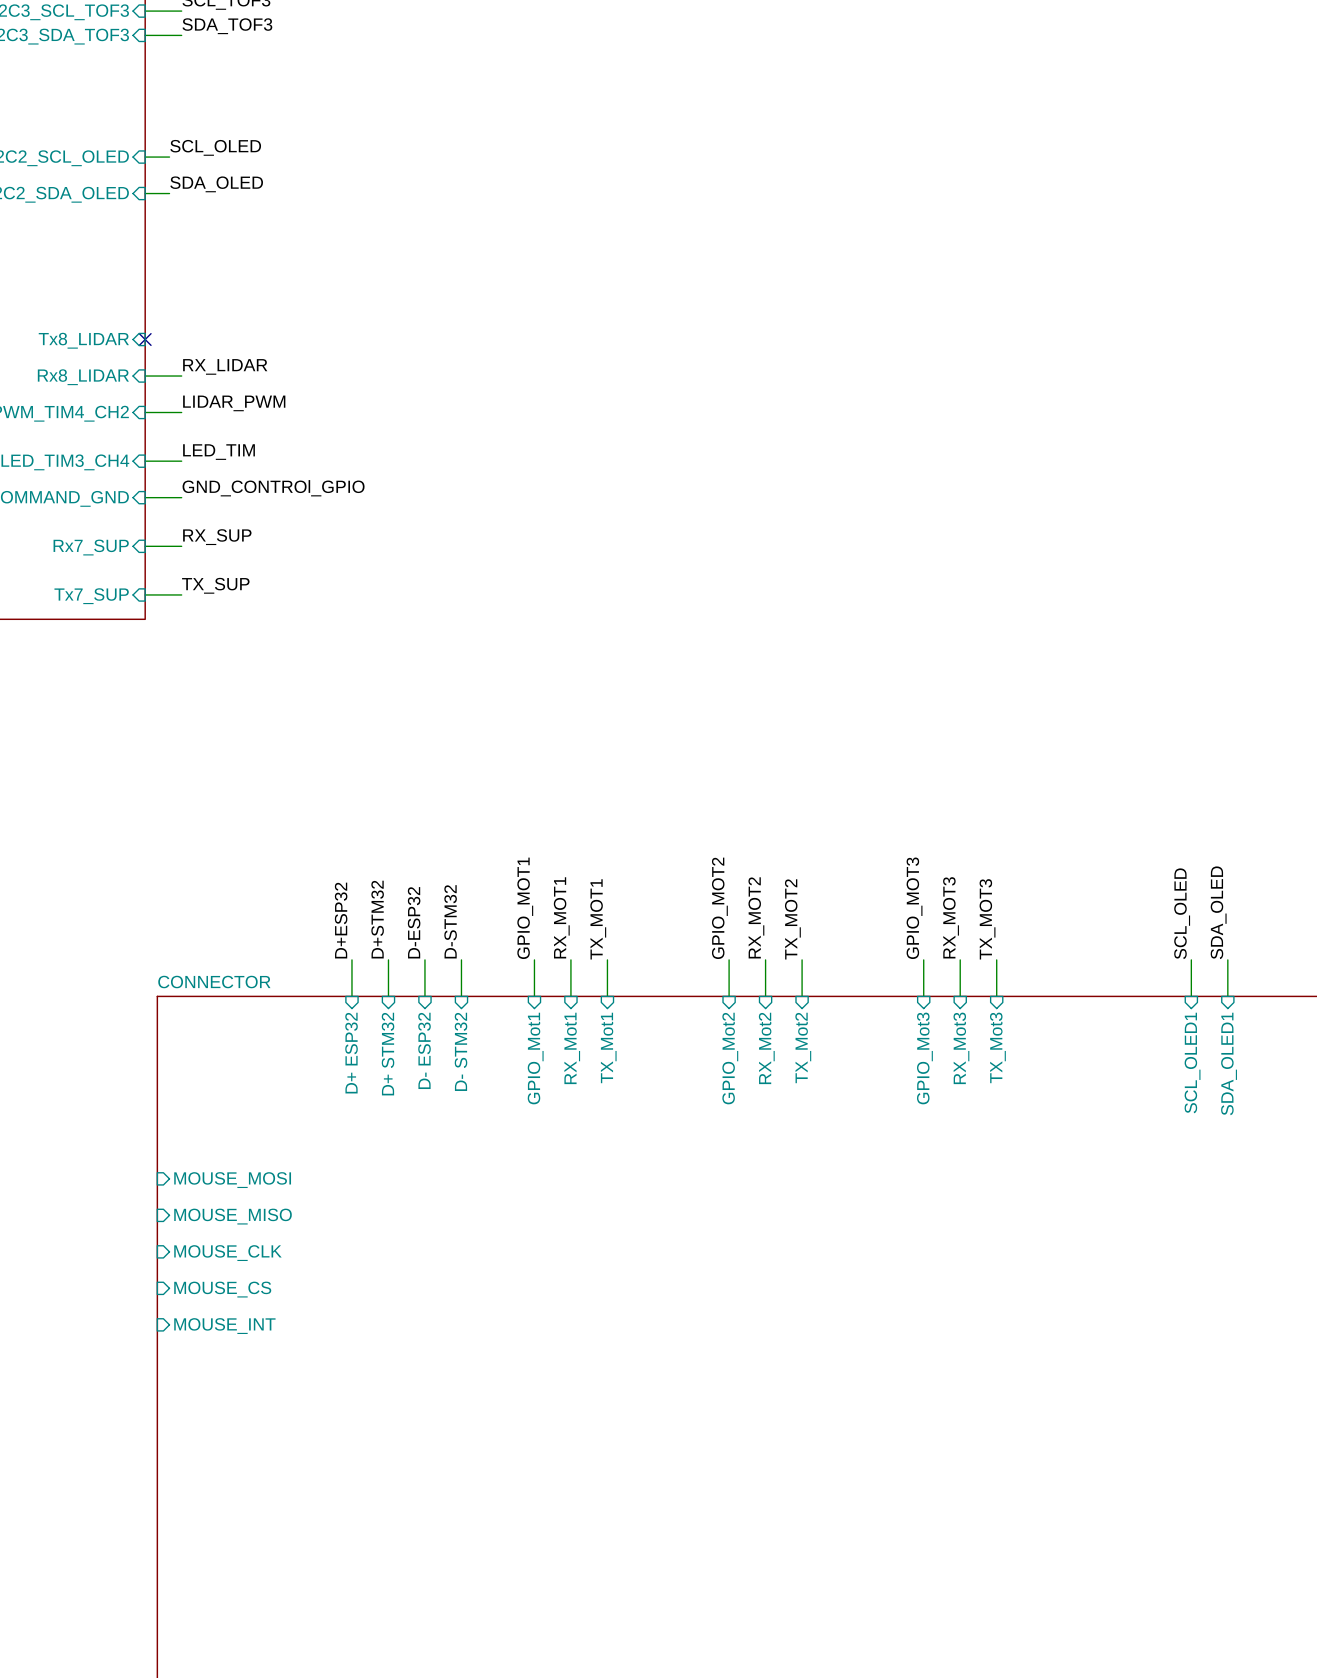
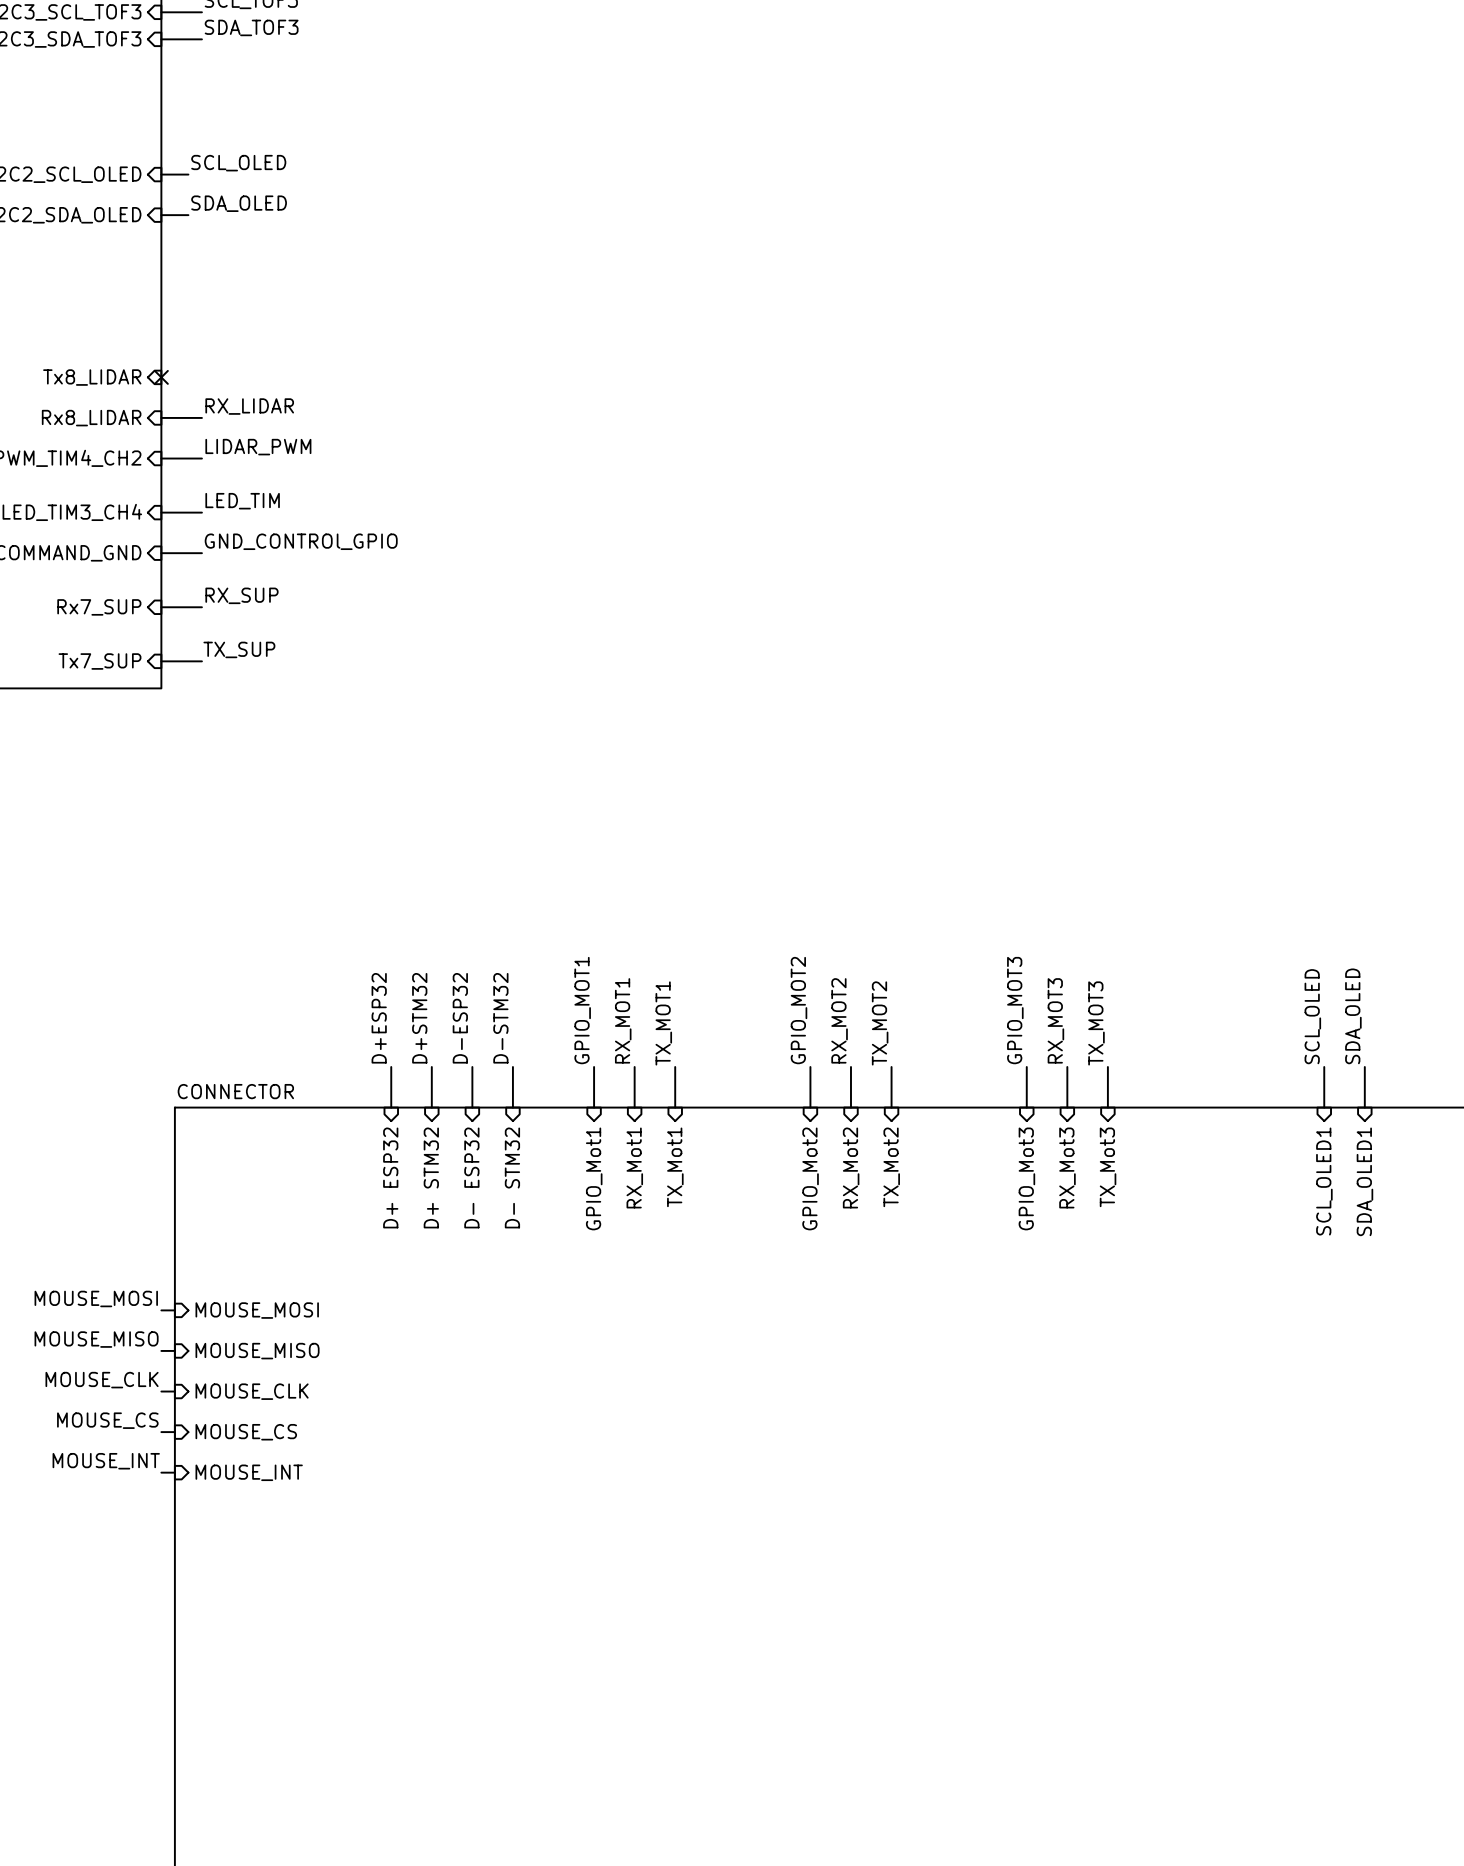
label: none -> MOUSE_MOSI (96, 1298)
wire: none -> (161, 1310) (174, 1310)
label: none -> MOUSE_MISO (96, 1339)
wire: none -> (161, 1350) (174, 1350)
label: none -> MOUSE_CLK (102, 1380)
wire: none -> (161, 1391) (174, 1391)
label: none -> MOUSE_CS (107, 1420)
wire: none -> (161, 1432) (174, 1432)
label: none -> MOUSE_INT (106, 1461)
wire: none -> (161, 1472) (174, 1472)

